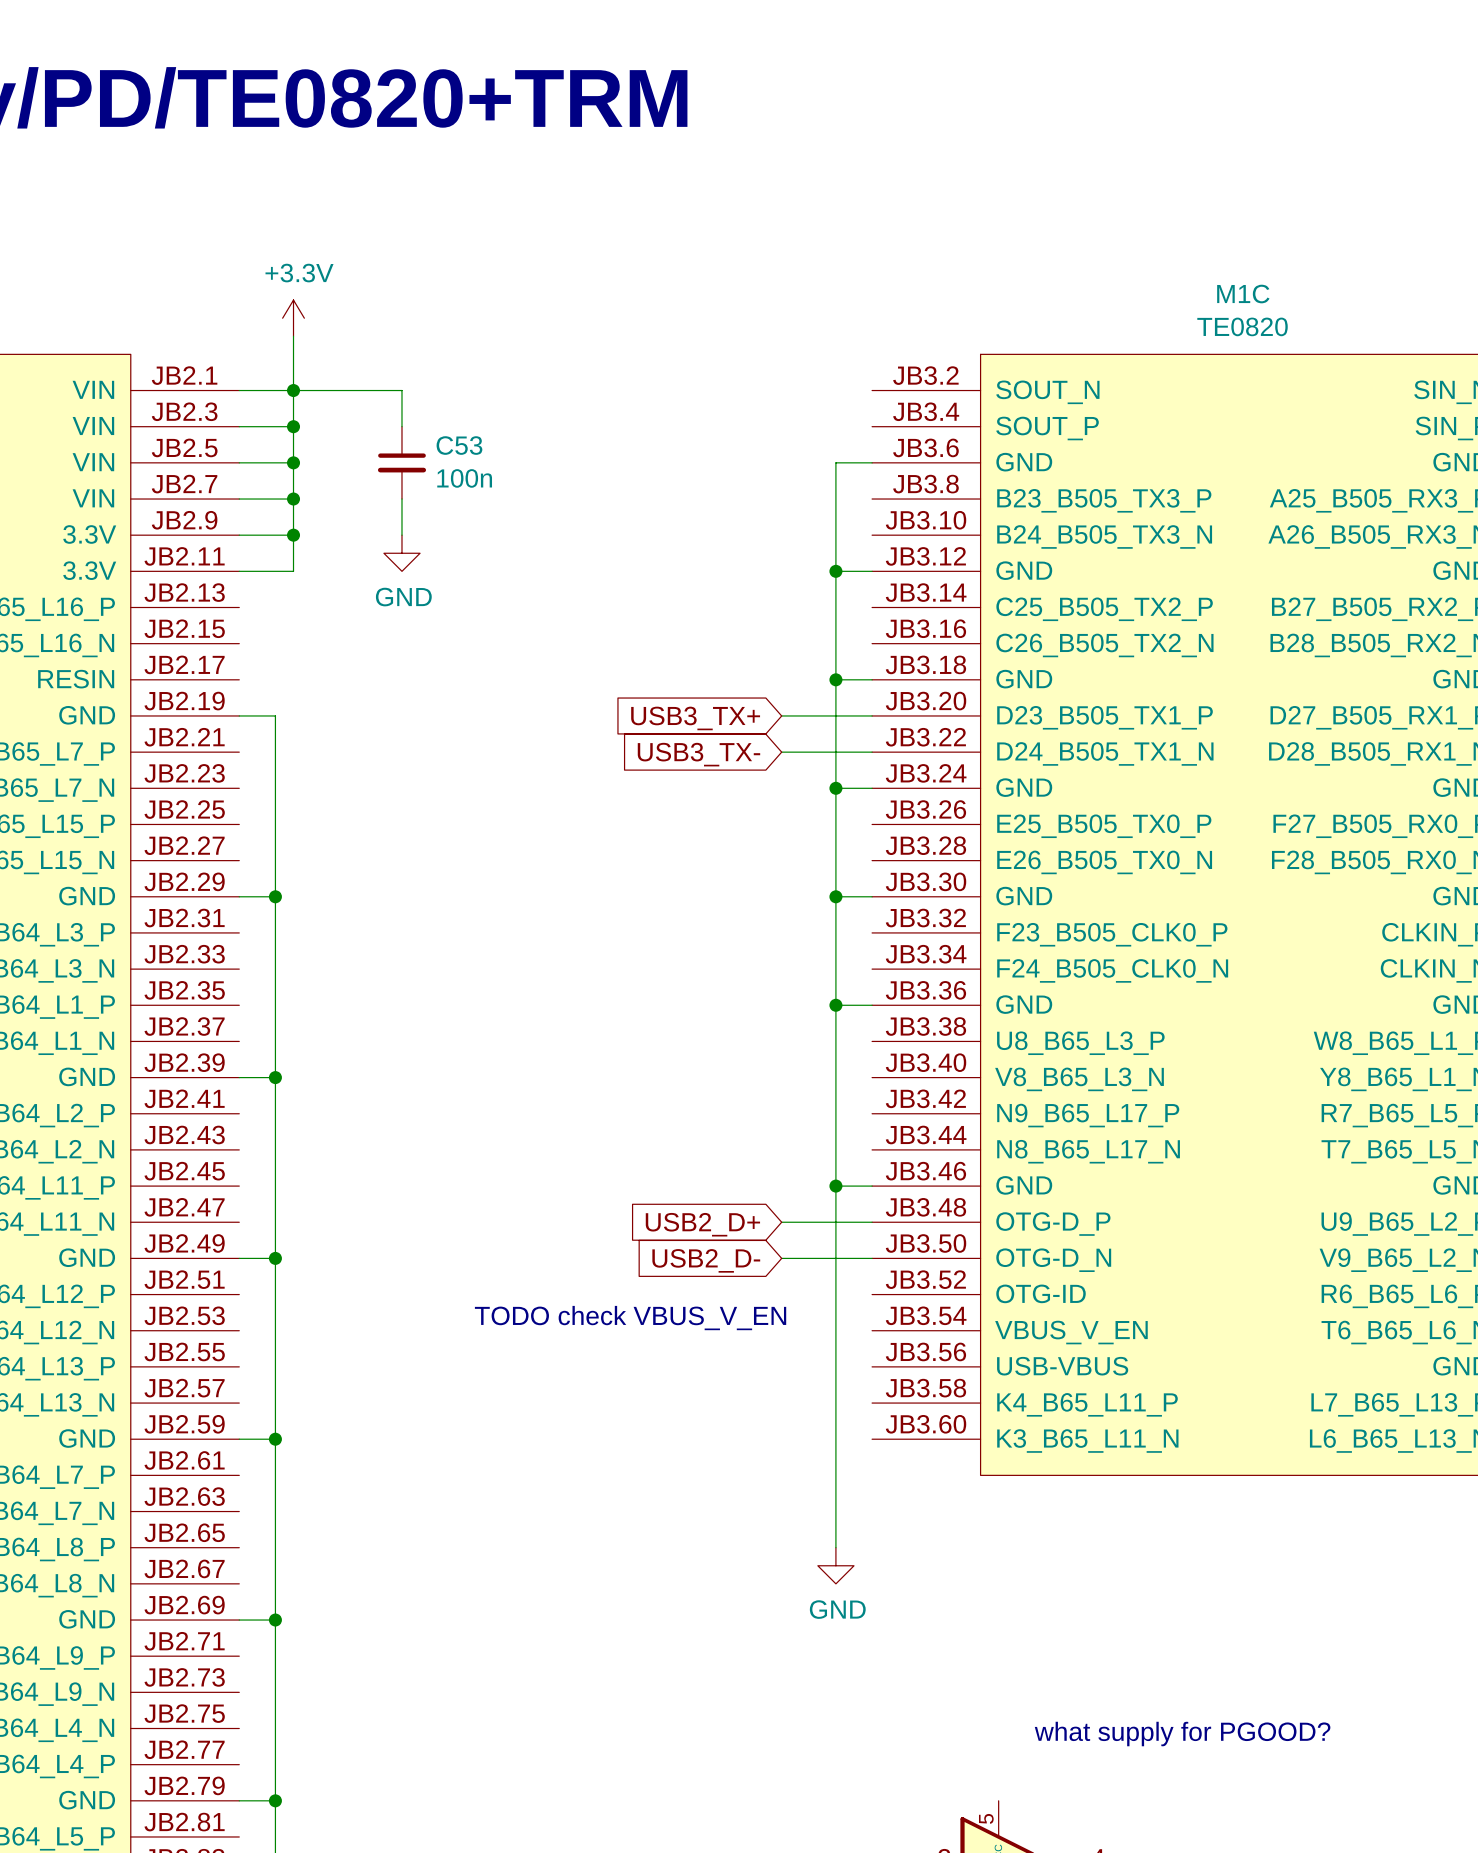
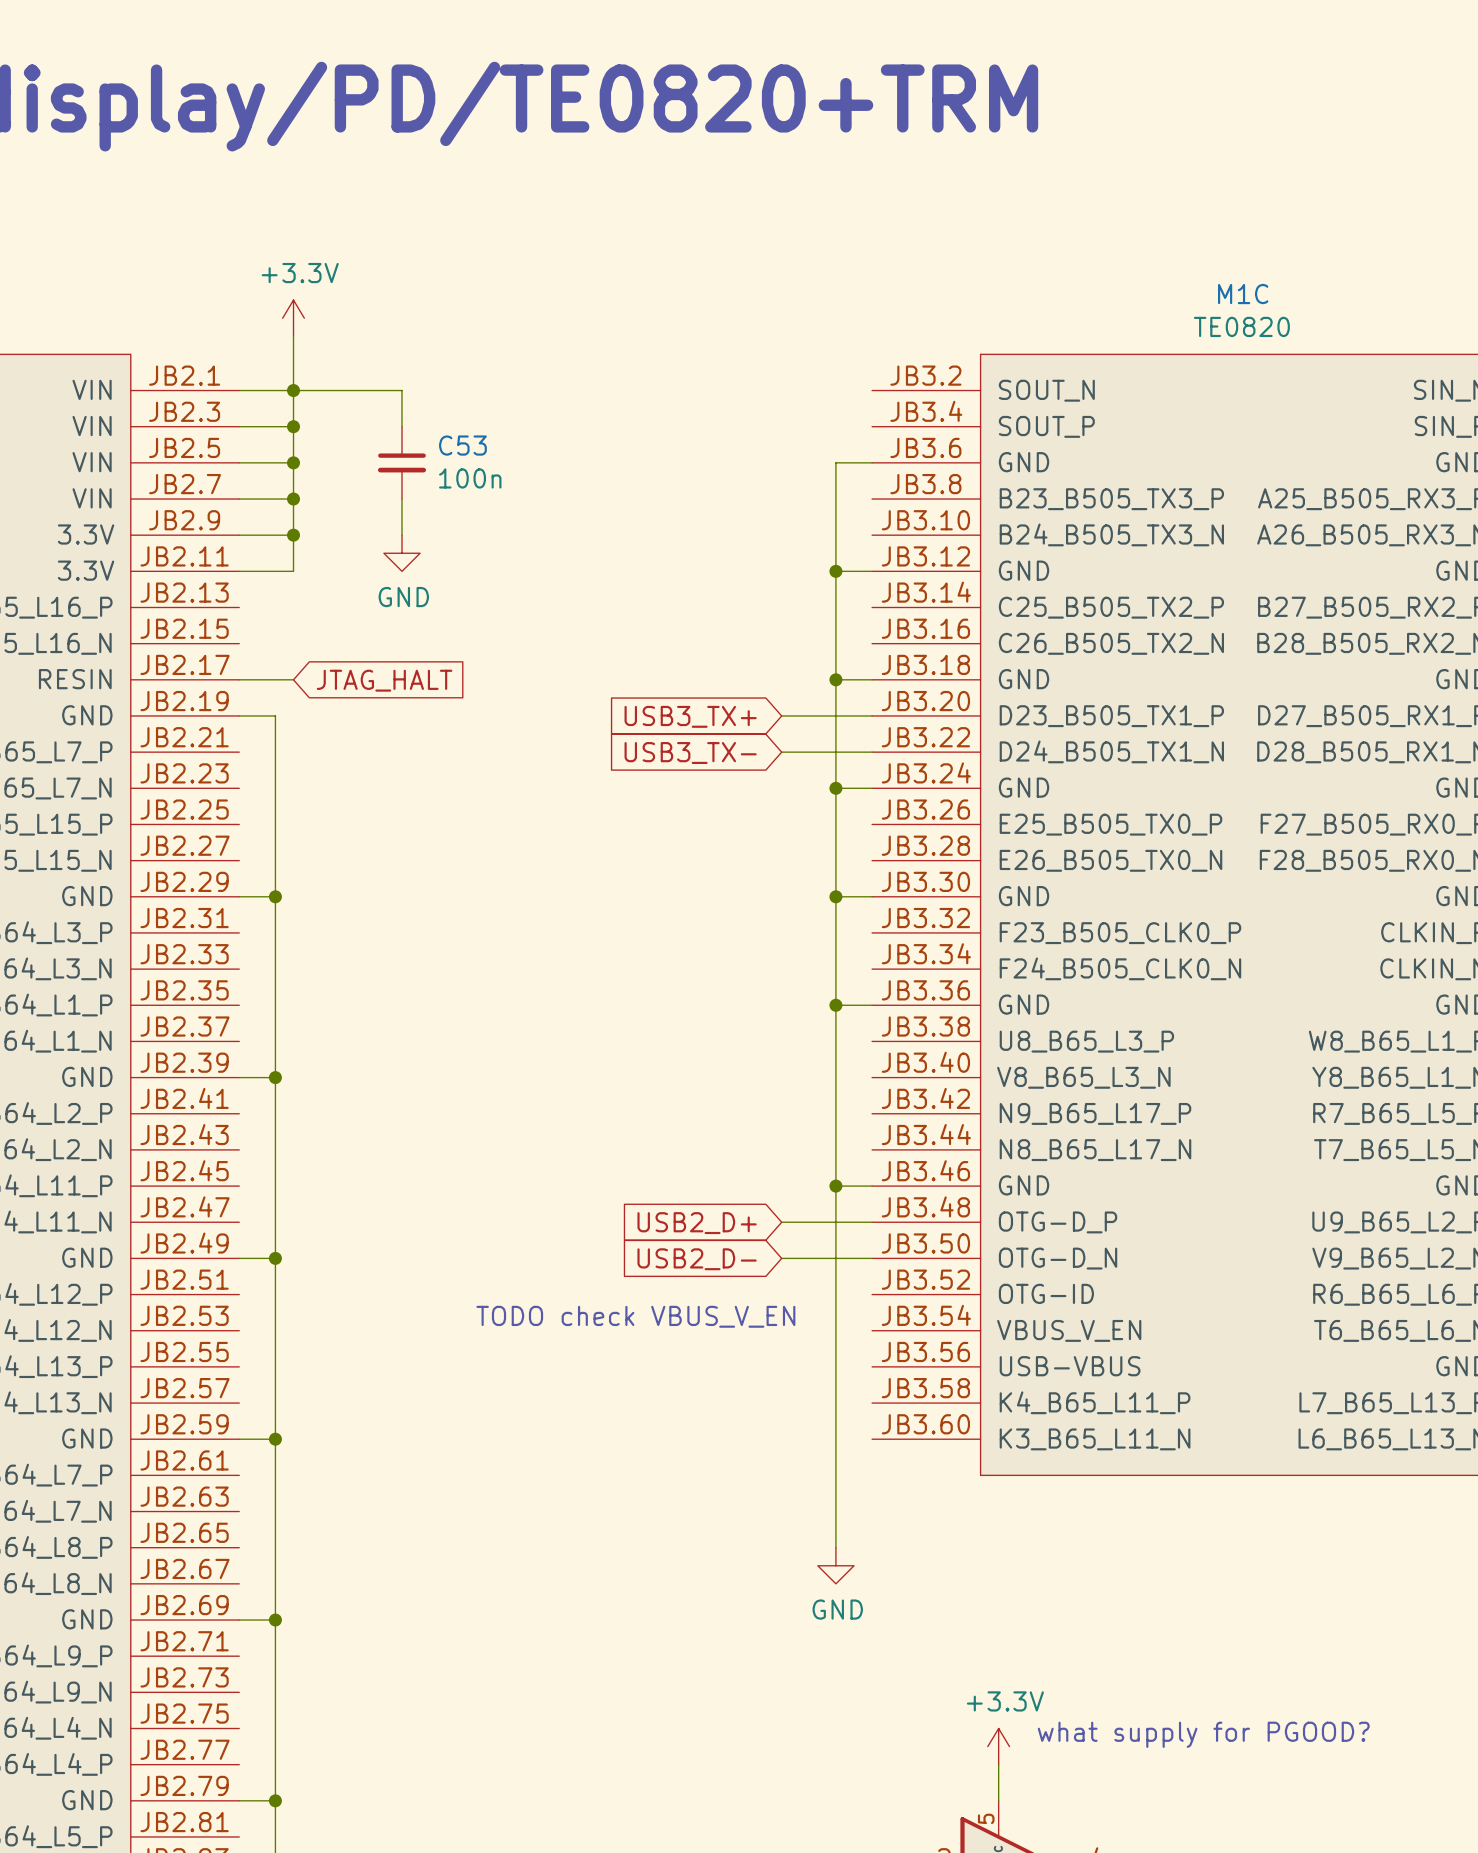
wire: none -> (239, 679) (293, 679)
global label: none -> JTAG_HALT (384, 680)
power symbol: none -> +3.3V (998, 1746)
wire: none -> (998, 1764) (998, 1800)

